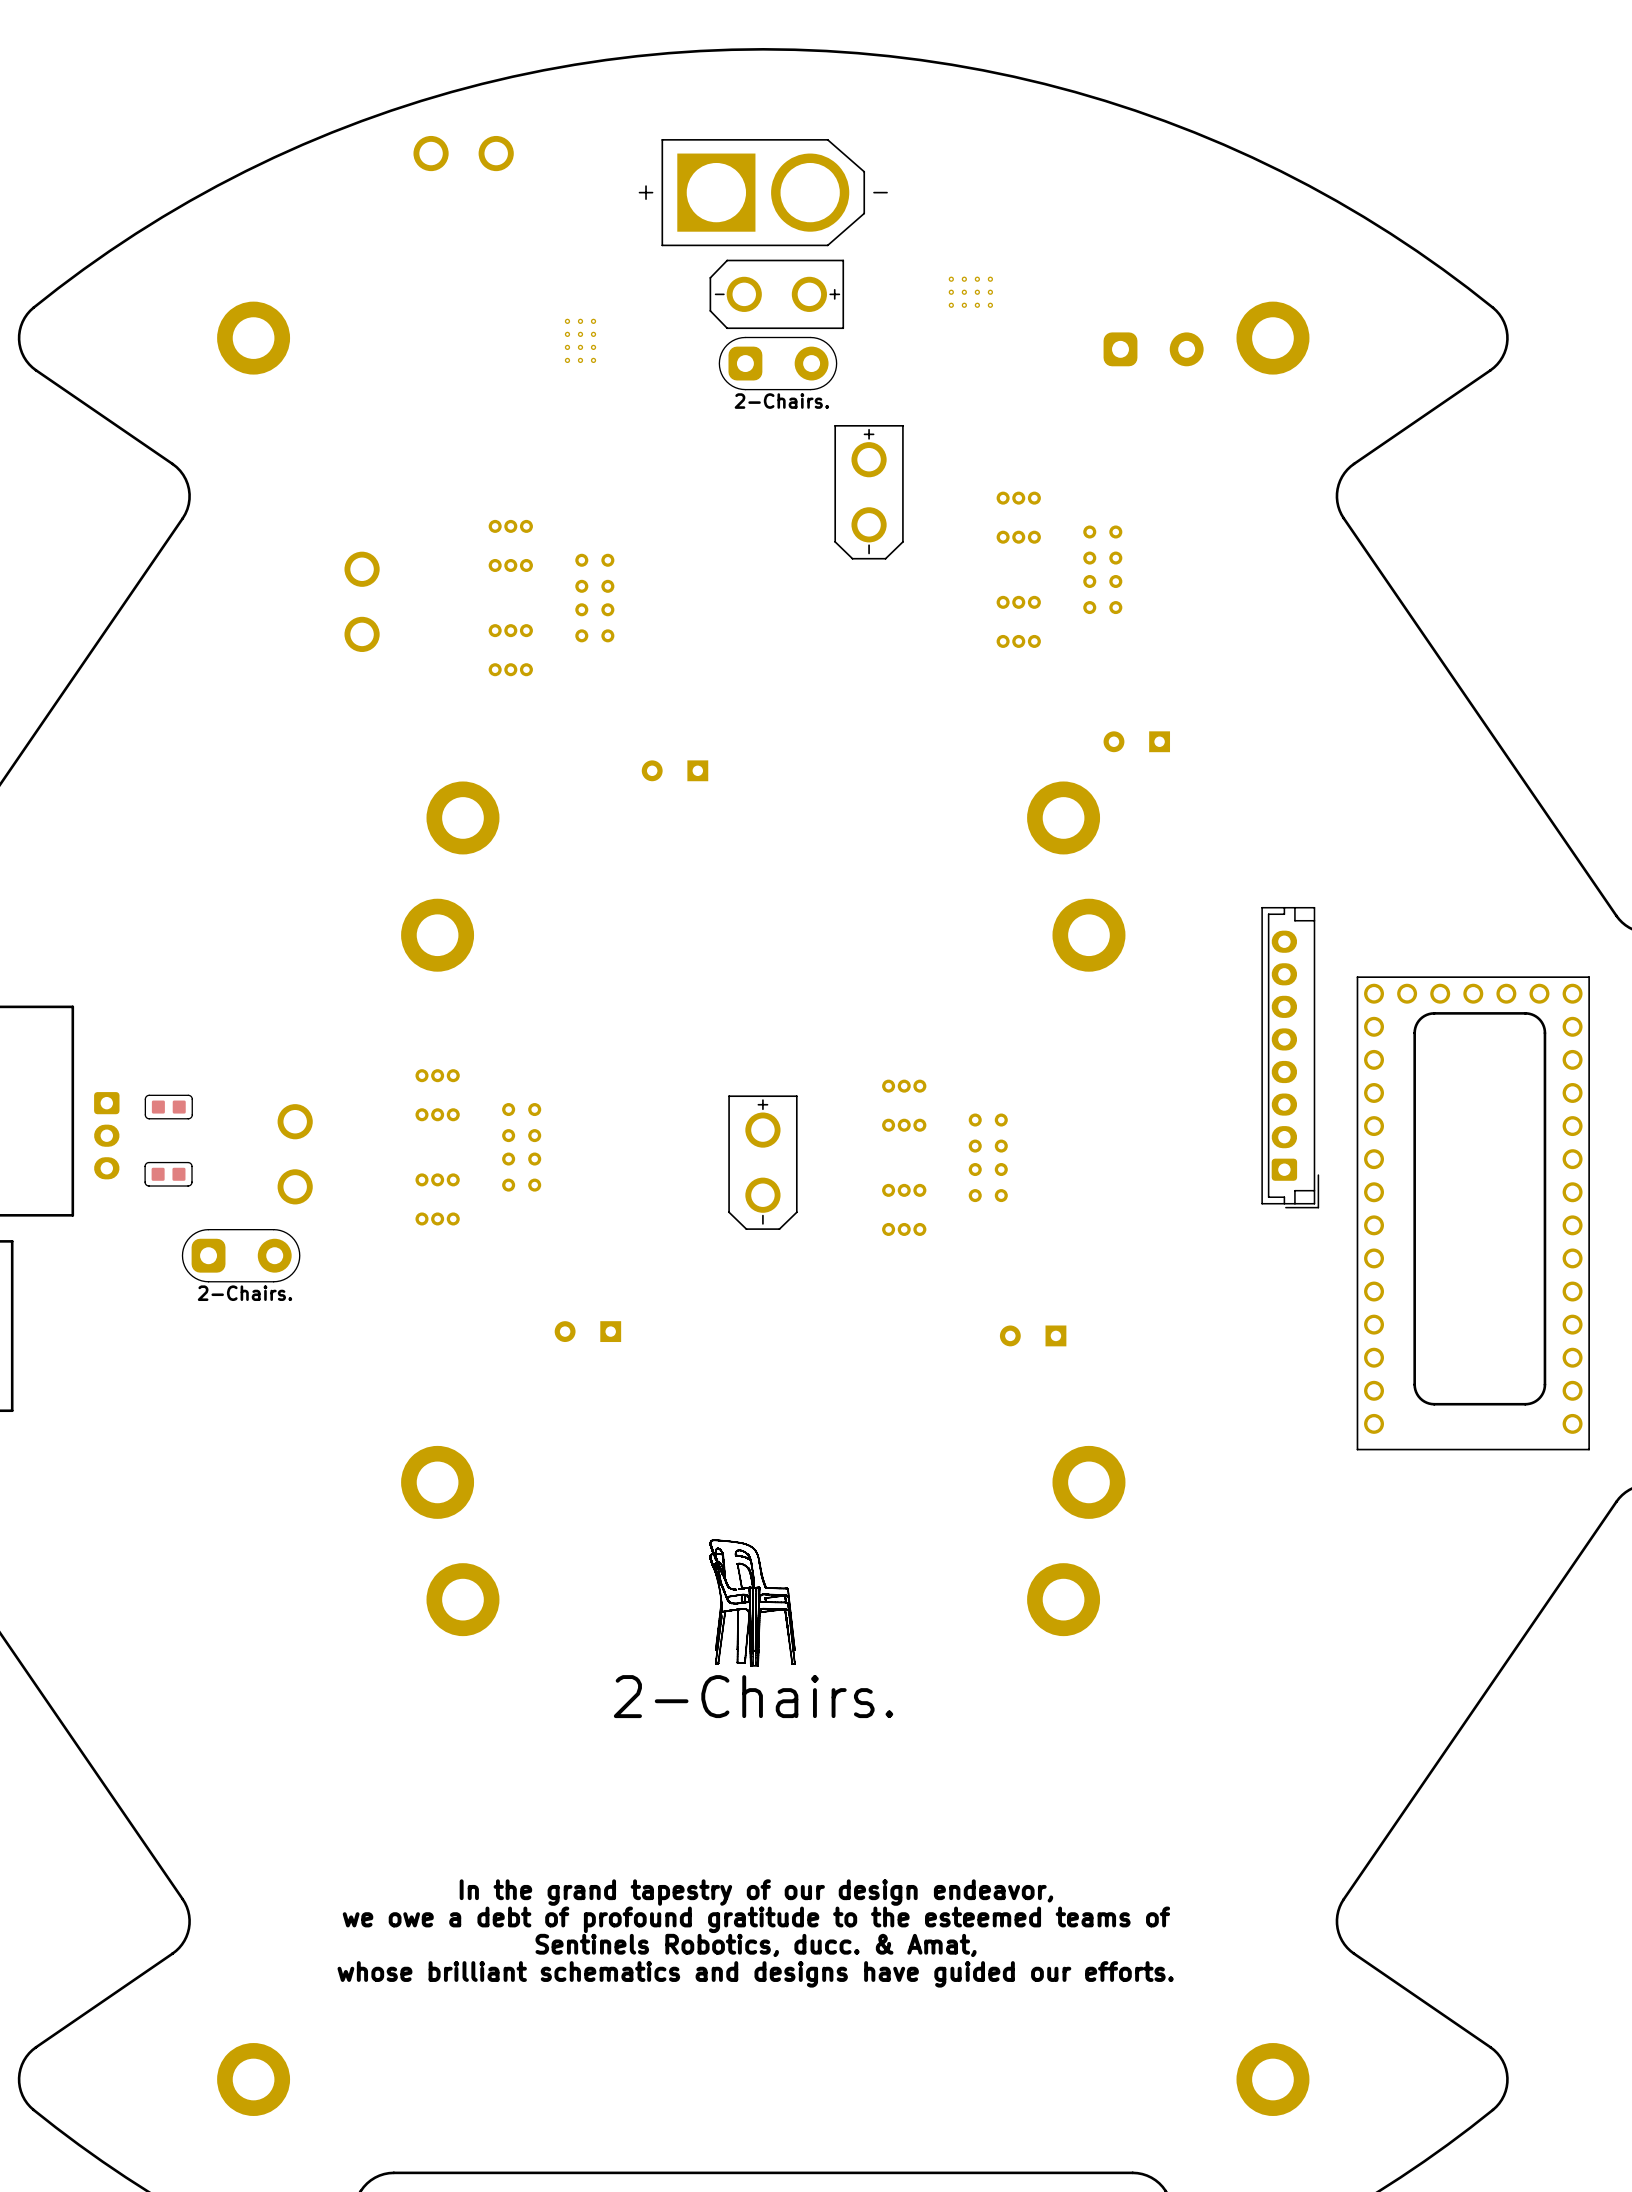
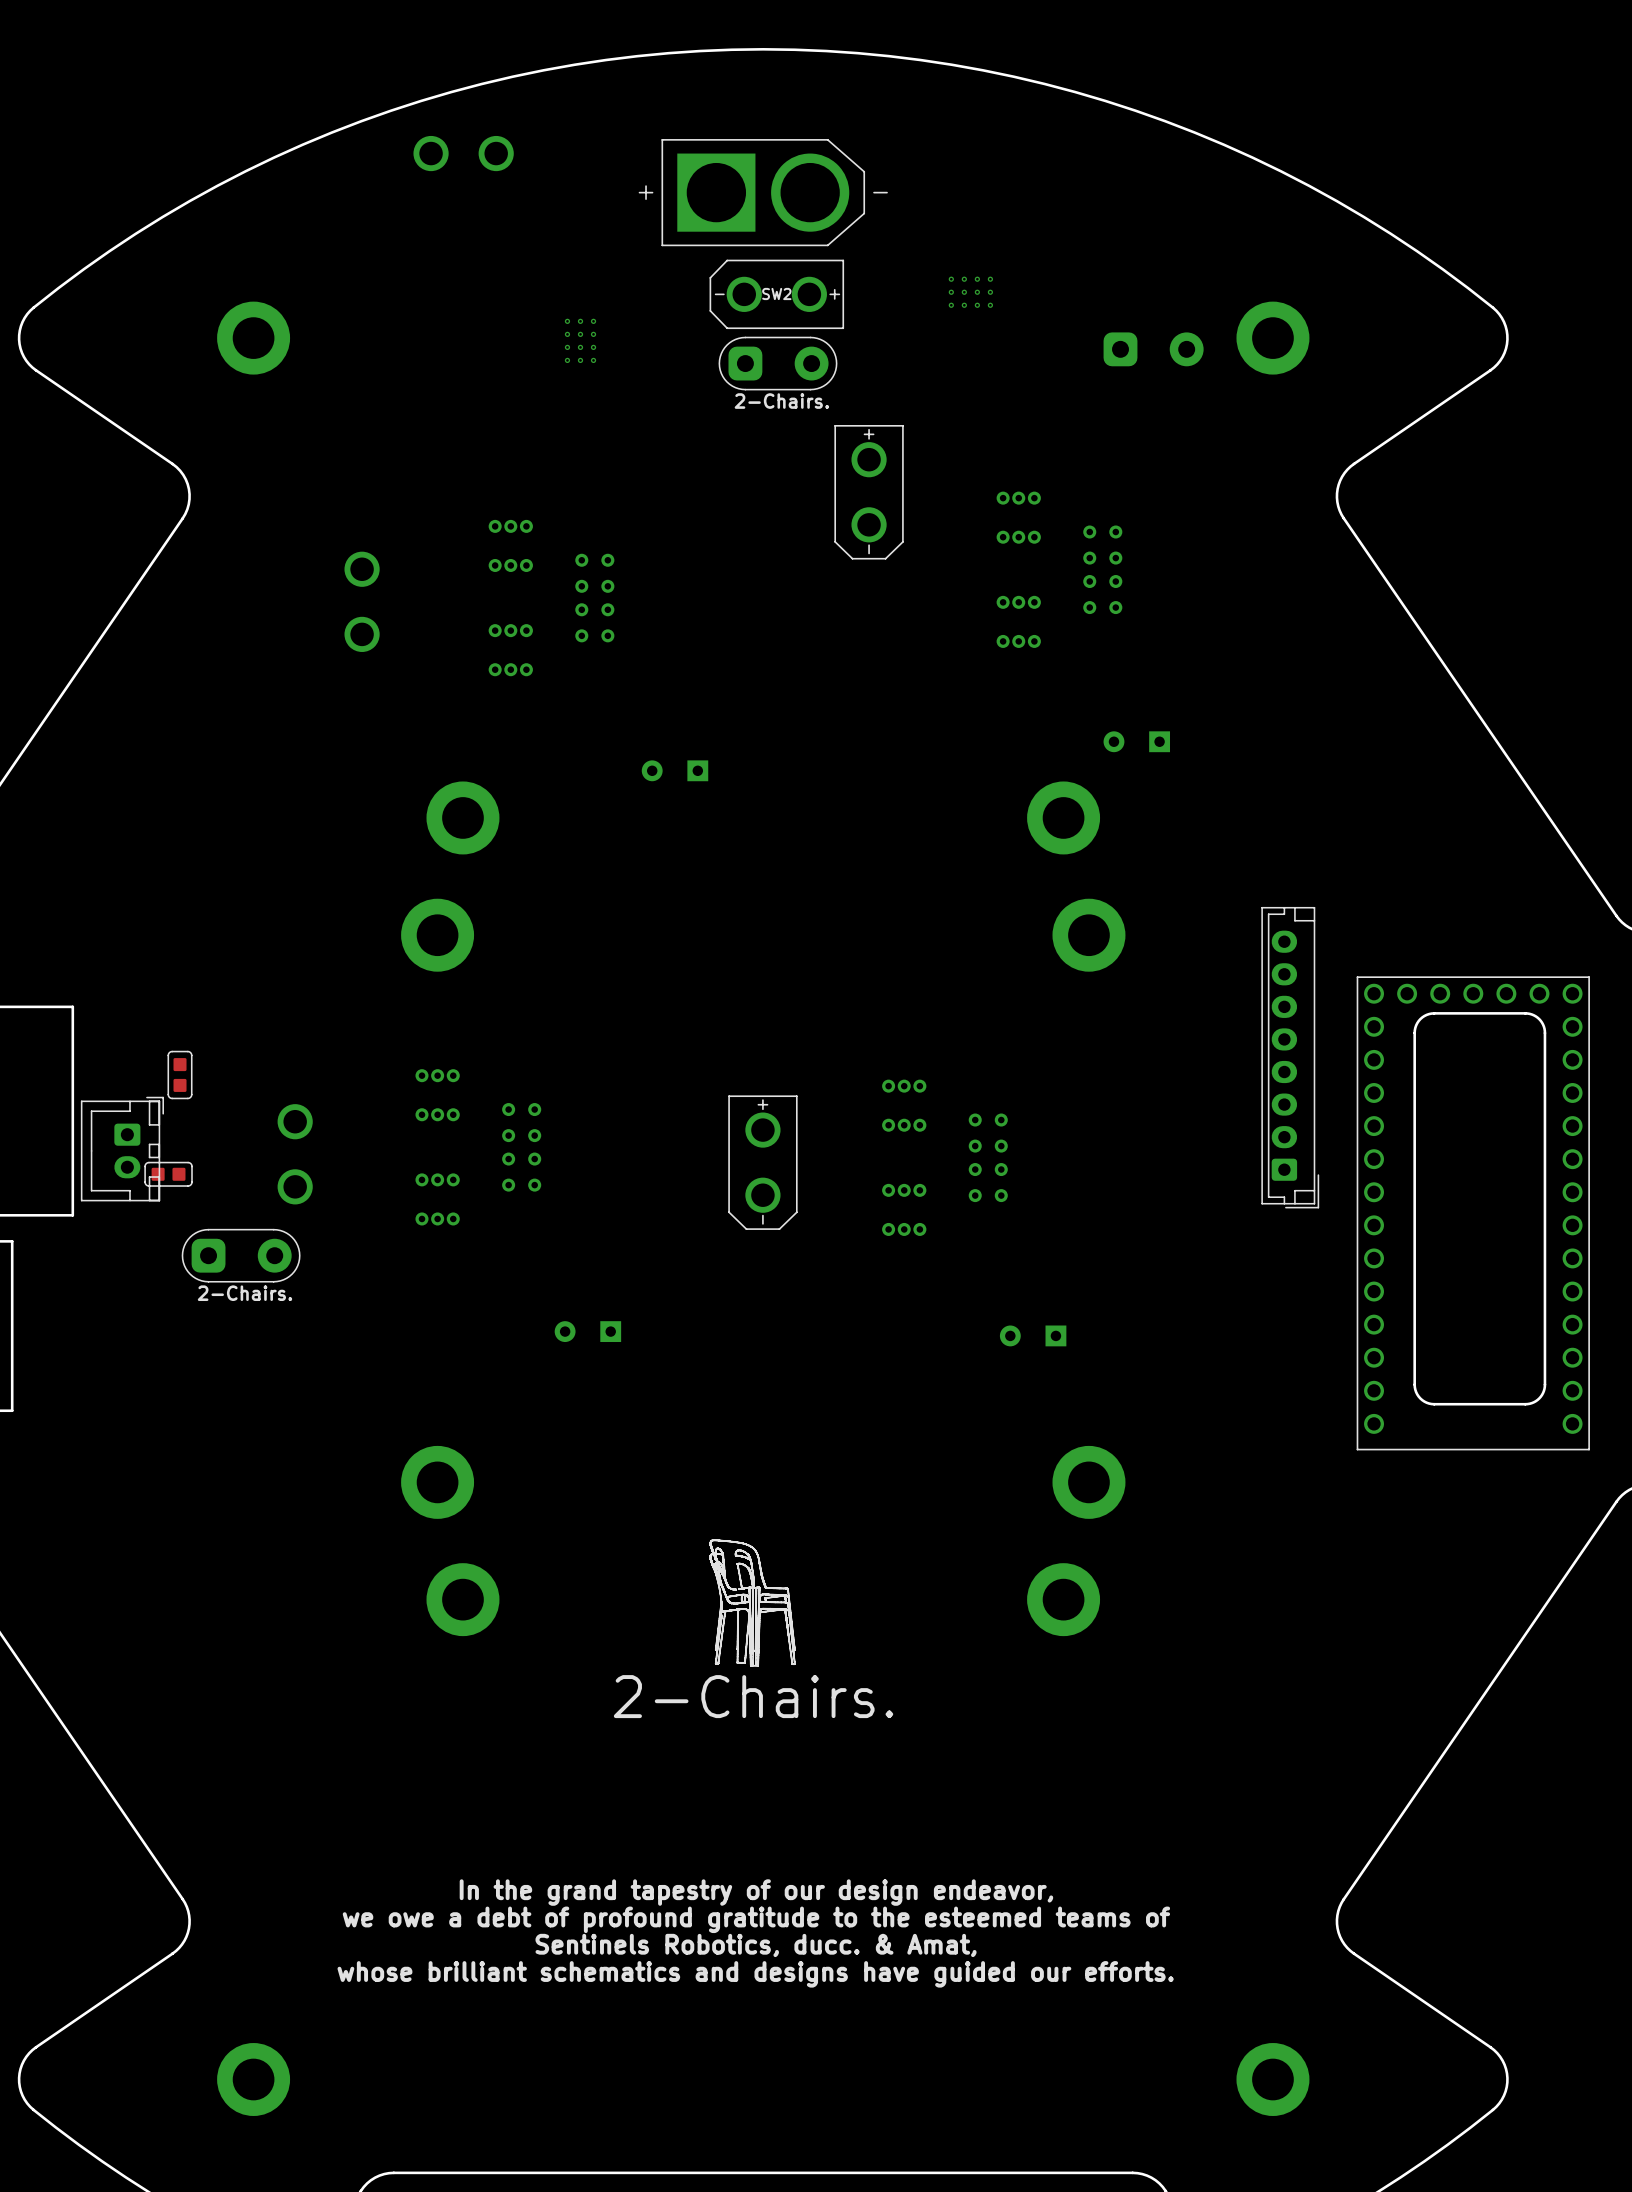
SW2 name: none -> SW2 (776, 293)
part rotation: 0° (168, 1107) -> 90° clockwise (180, 1075)
part position: (168, 1107) -> (180, 1075)
part: (106, 1135) -> none
part: none -> (122, 1149)

